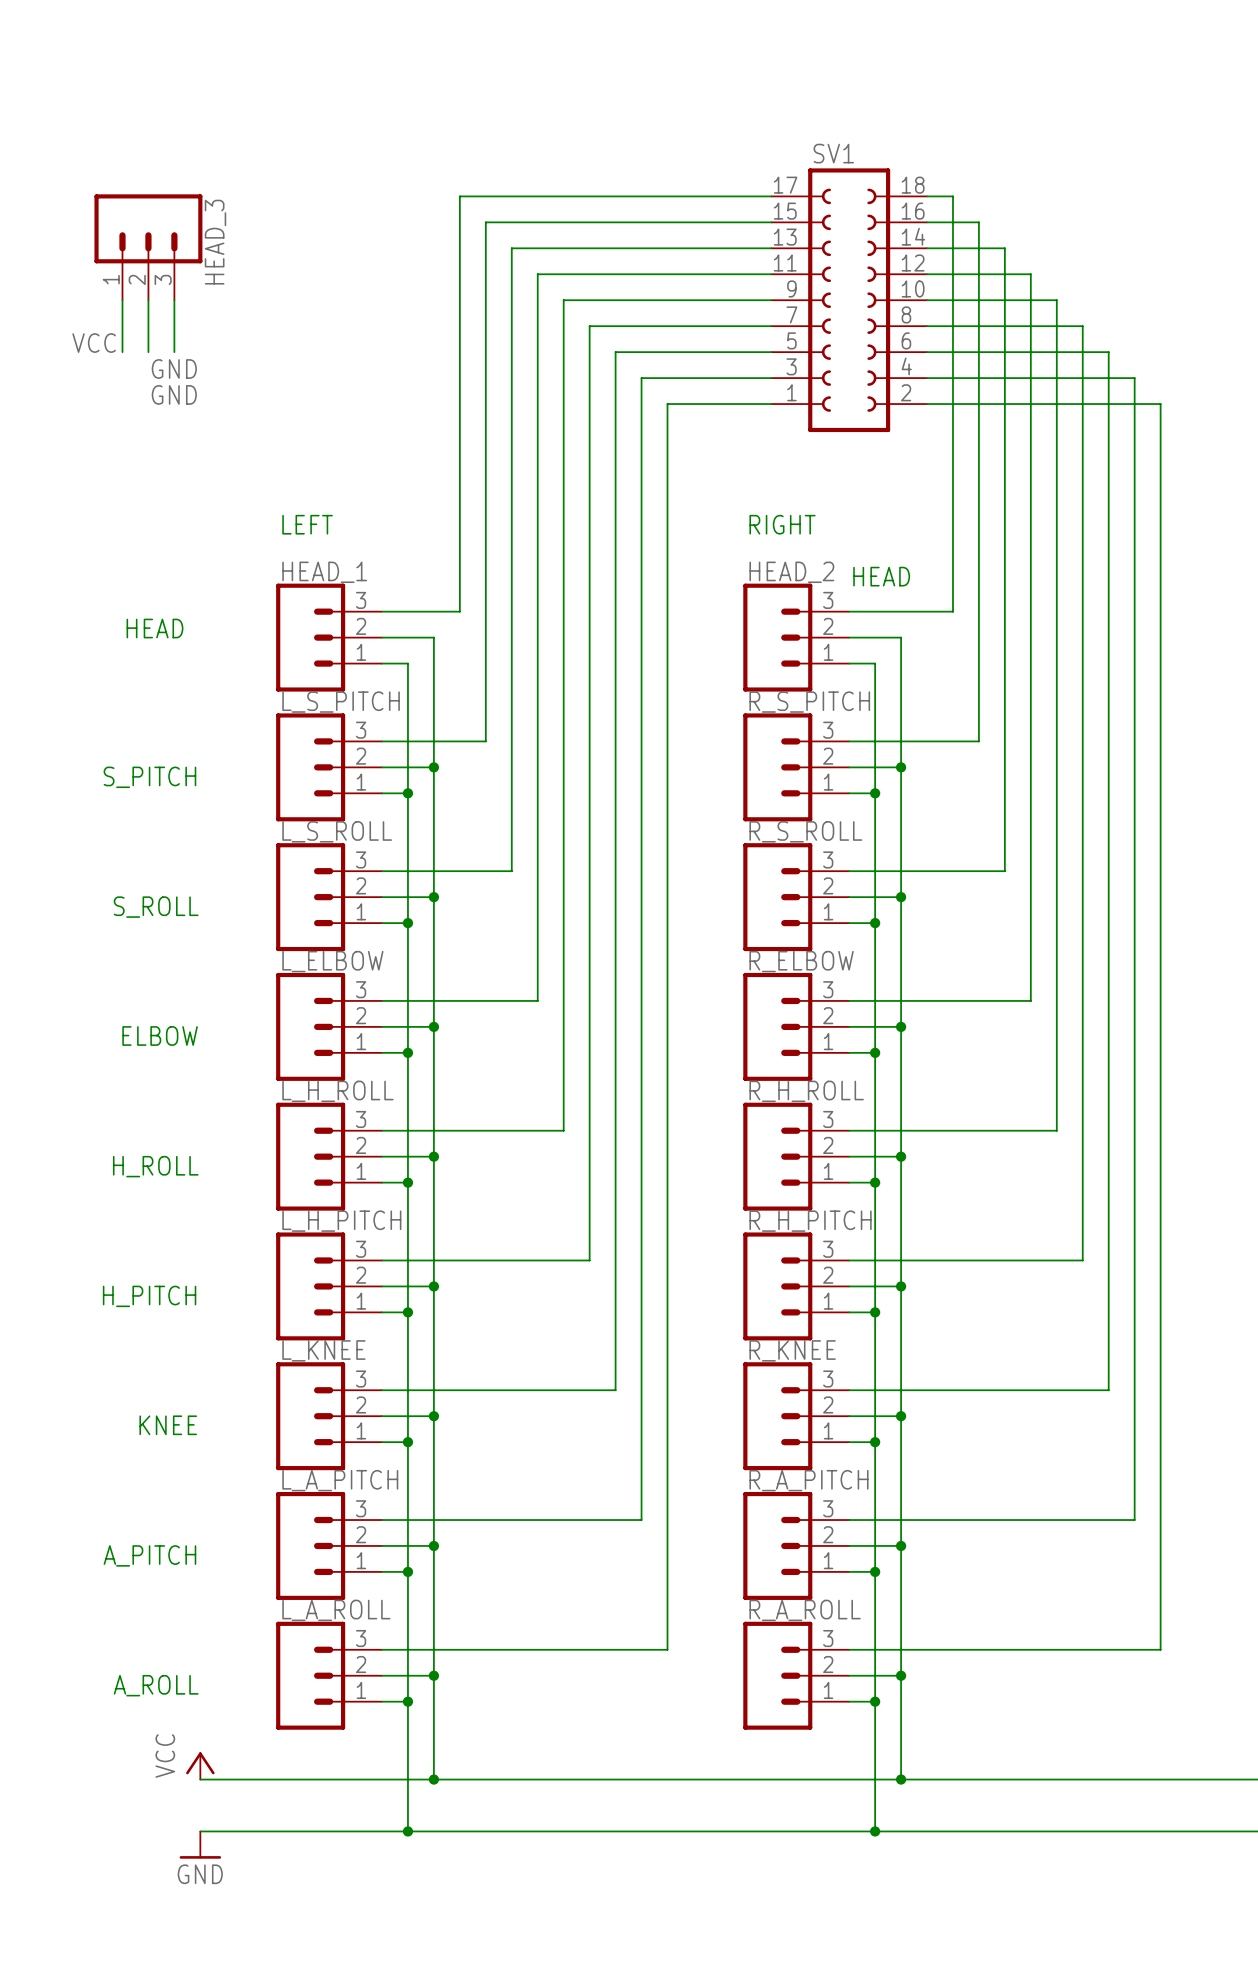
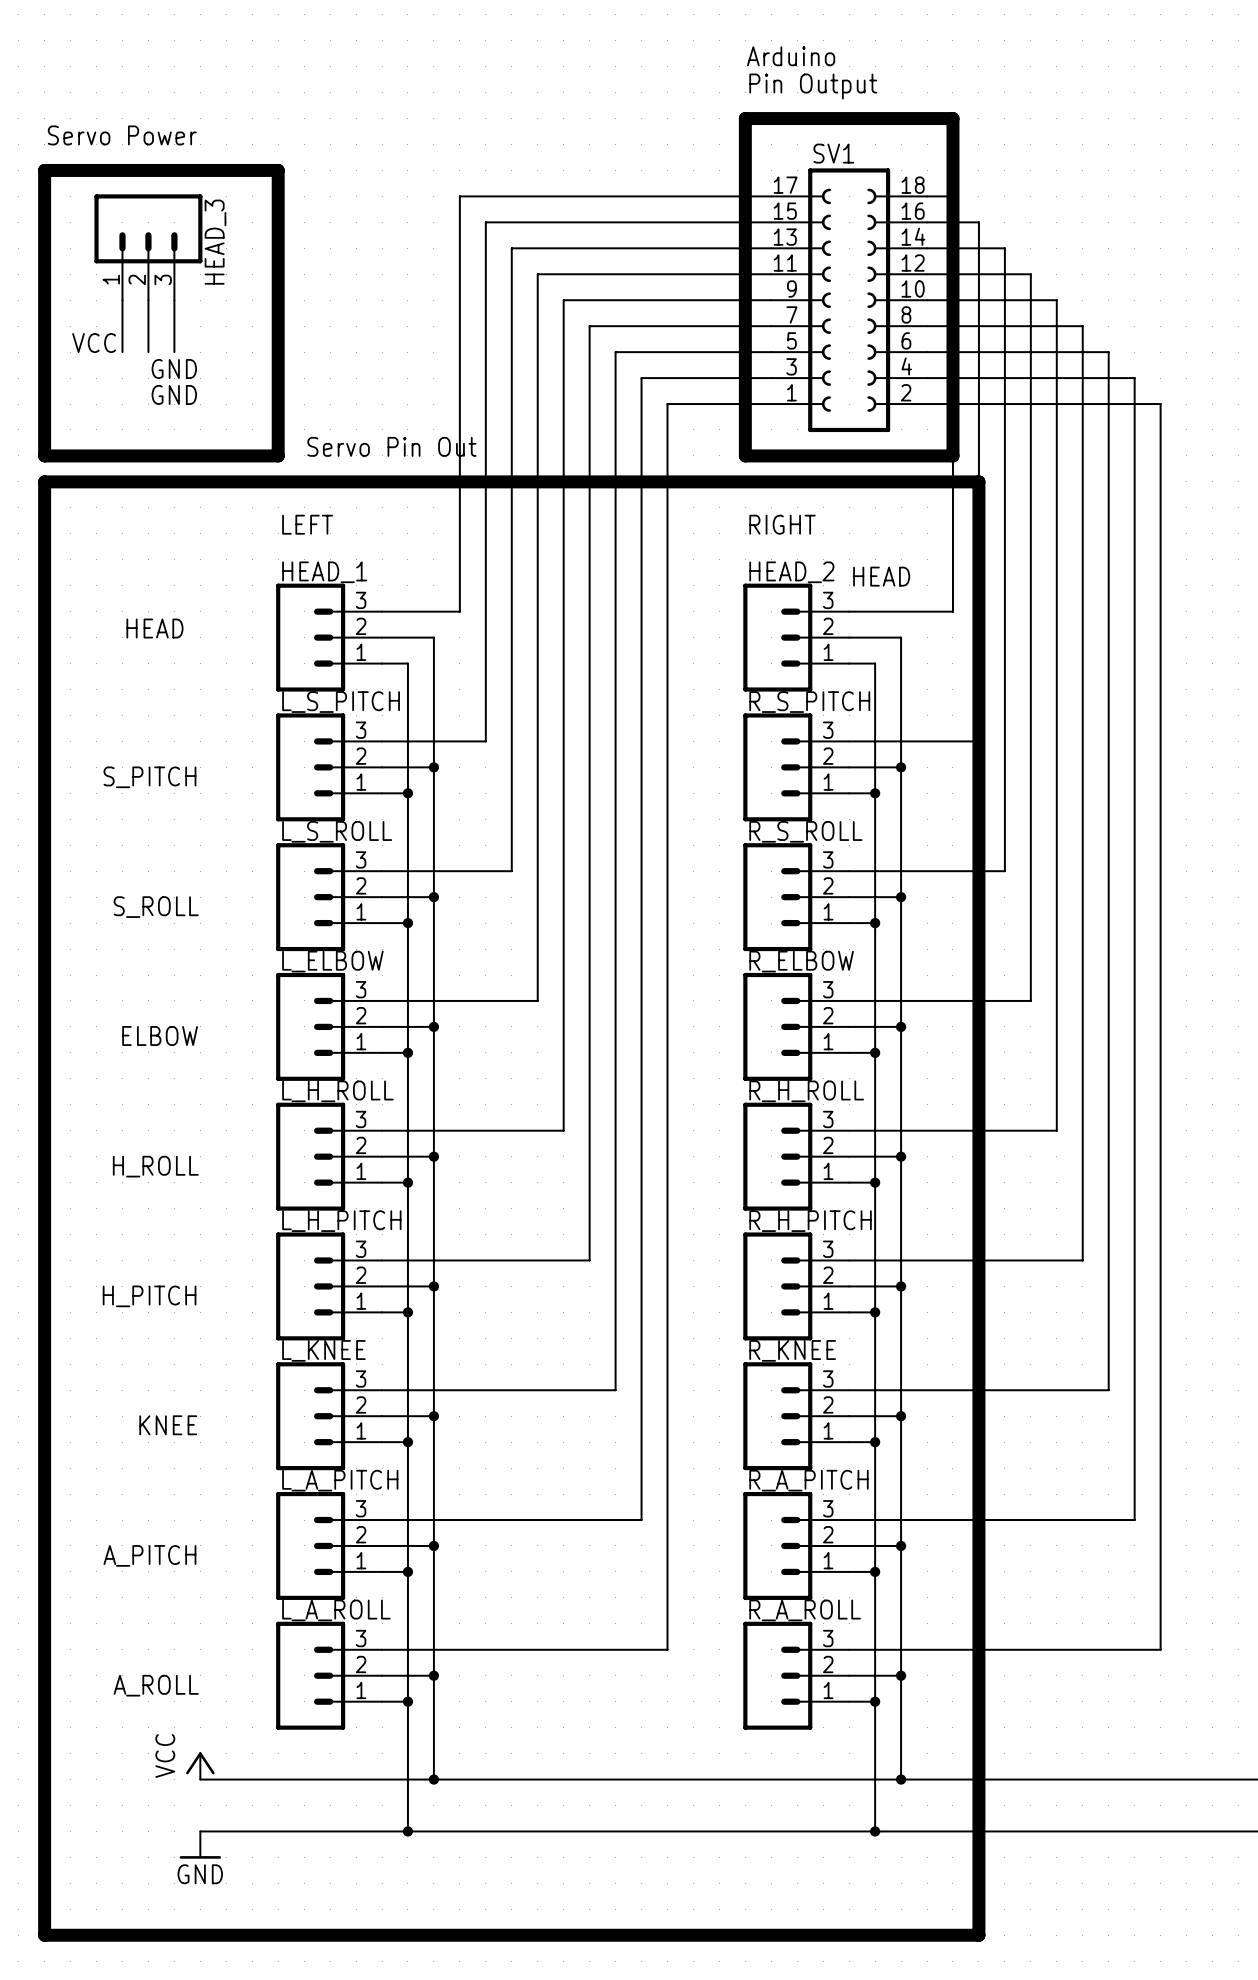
text: none -> Arduino (791, 56)
text: none -> Pin Output (813, 86)
line: none -> (745, 118) (952, 118) (952, 455) (745, 455) (745, 118)
text: none -> Servo Power (122, 135)
line: none -> (44, 170) (44, 455) (278, 455) (278, 170) (44, 170)
text: none -> Servo Pin Out (391, 446)
line: none -> (44, 481) (44, 1935) (978, 1935) (978, 481) (44, 481)

